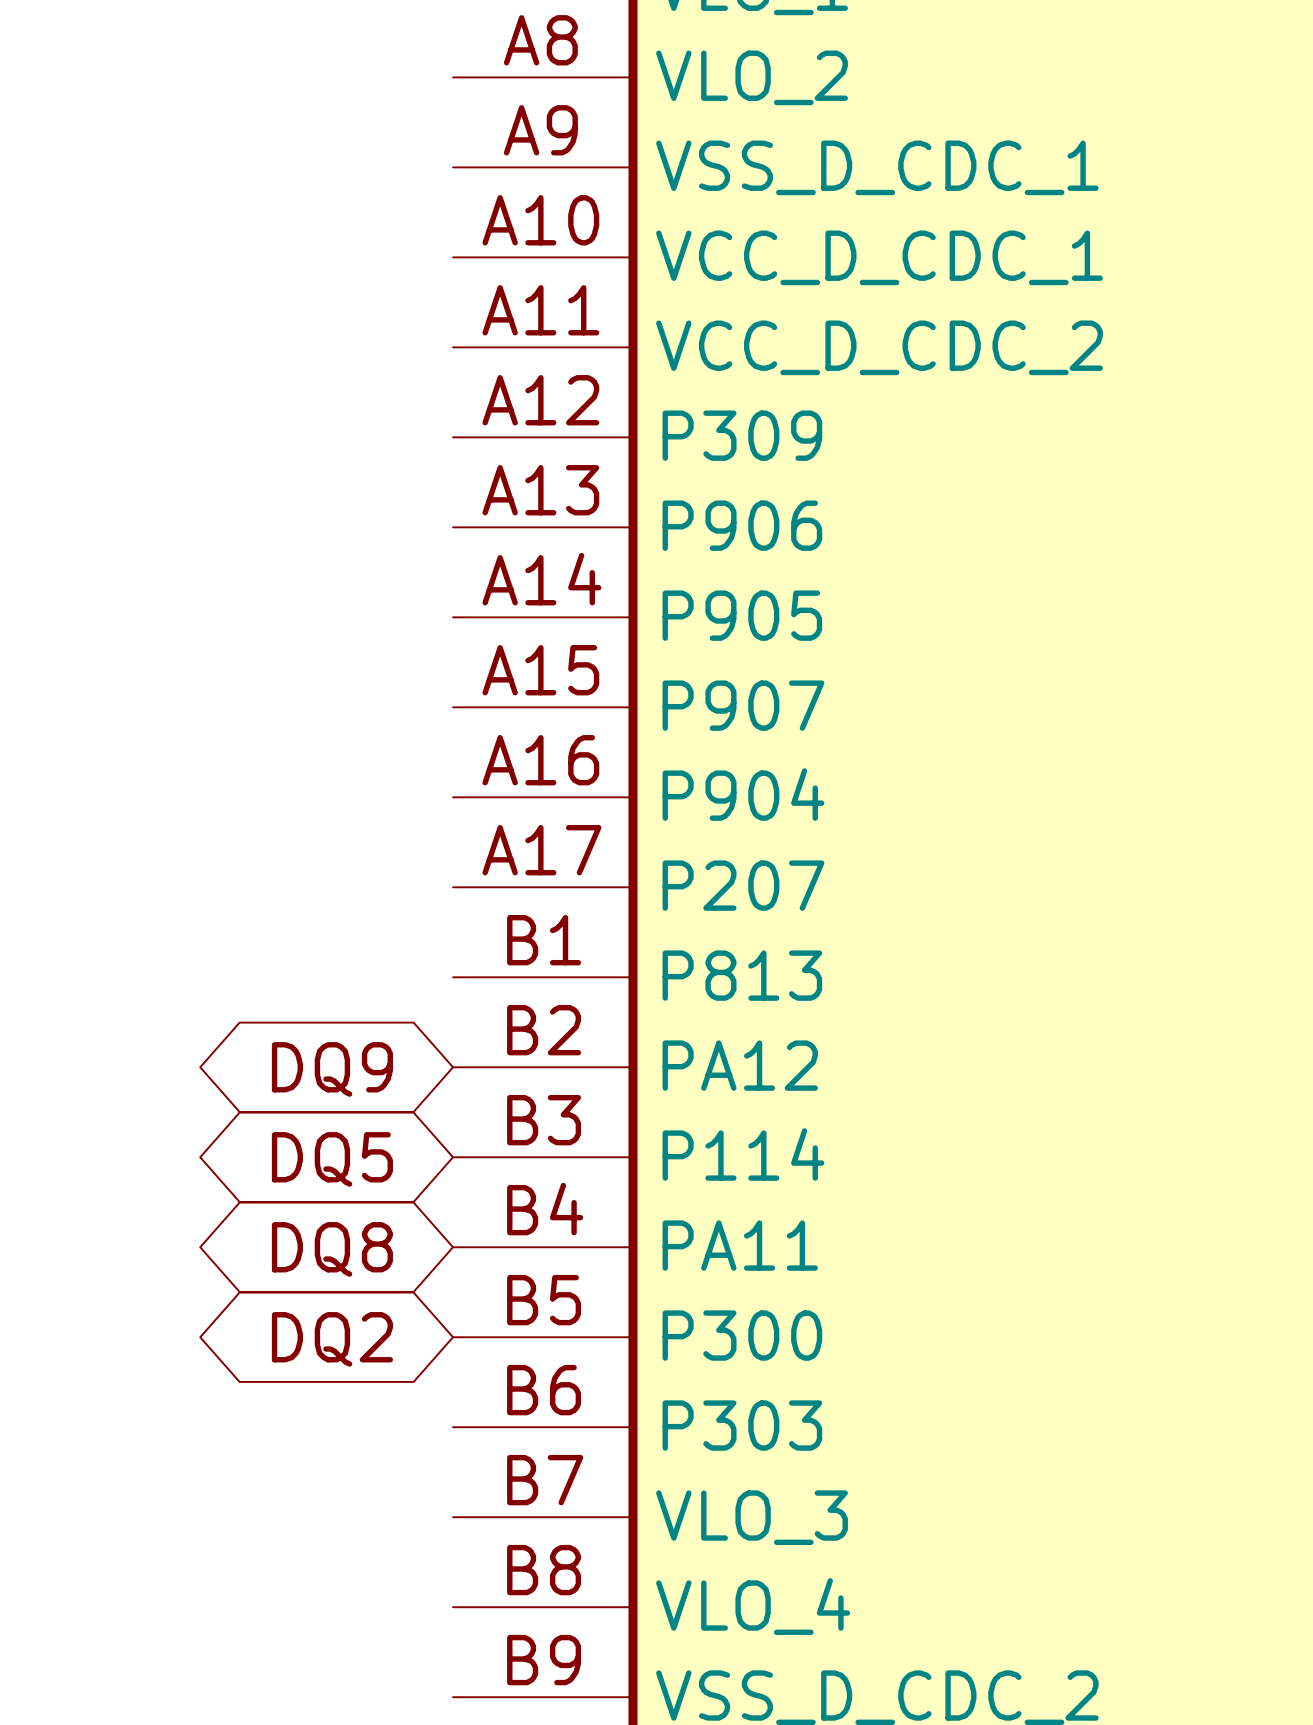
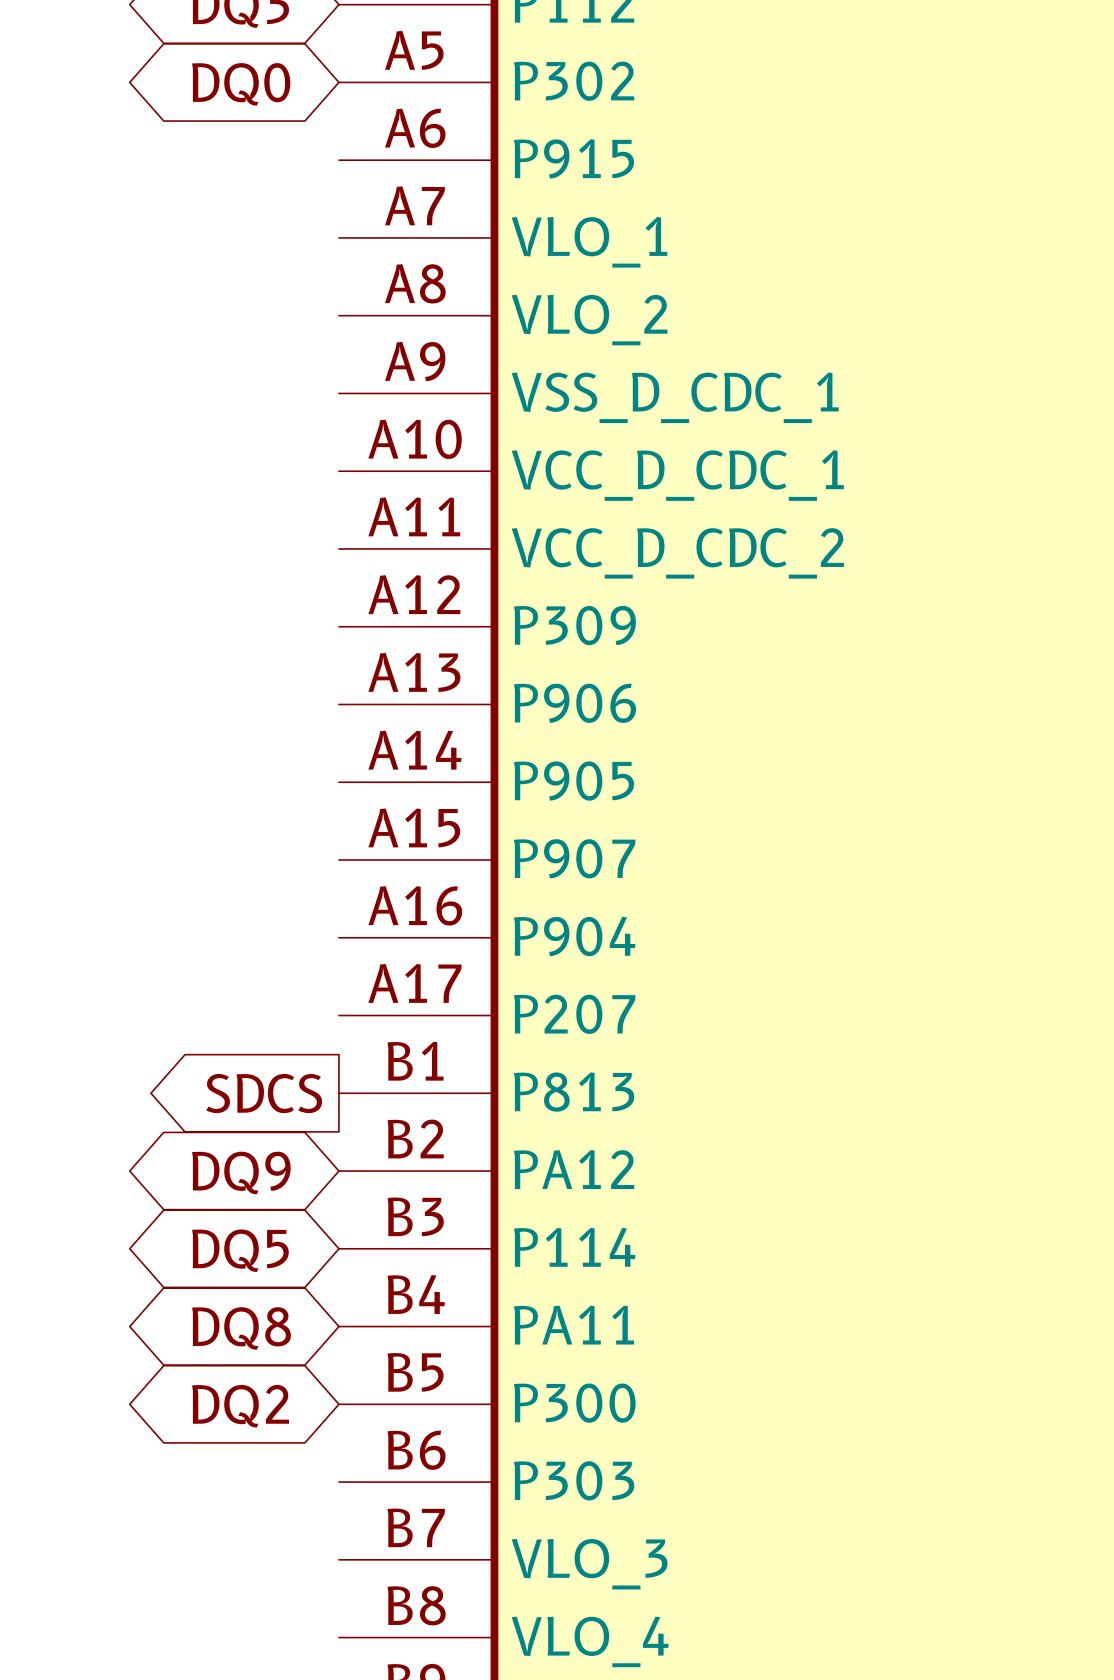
global label: none -> SDCS (264, 1093)

